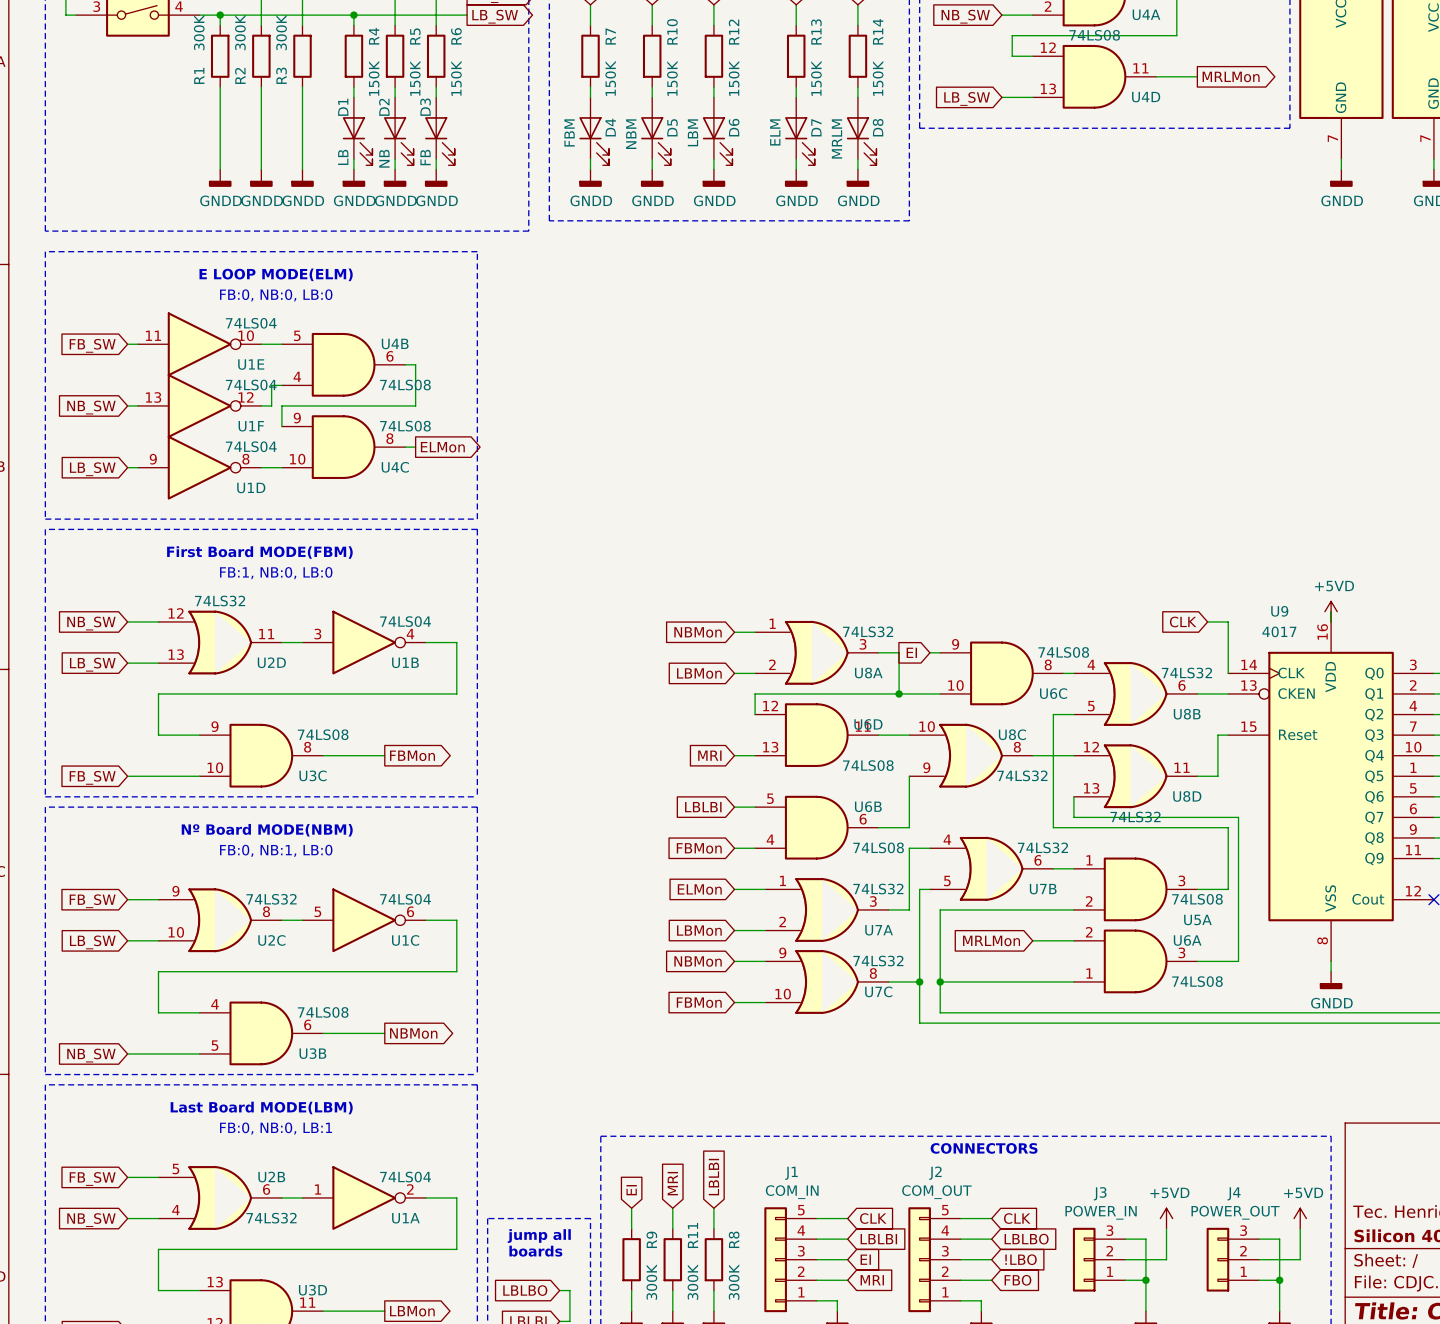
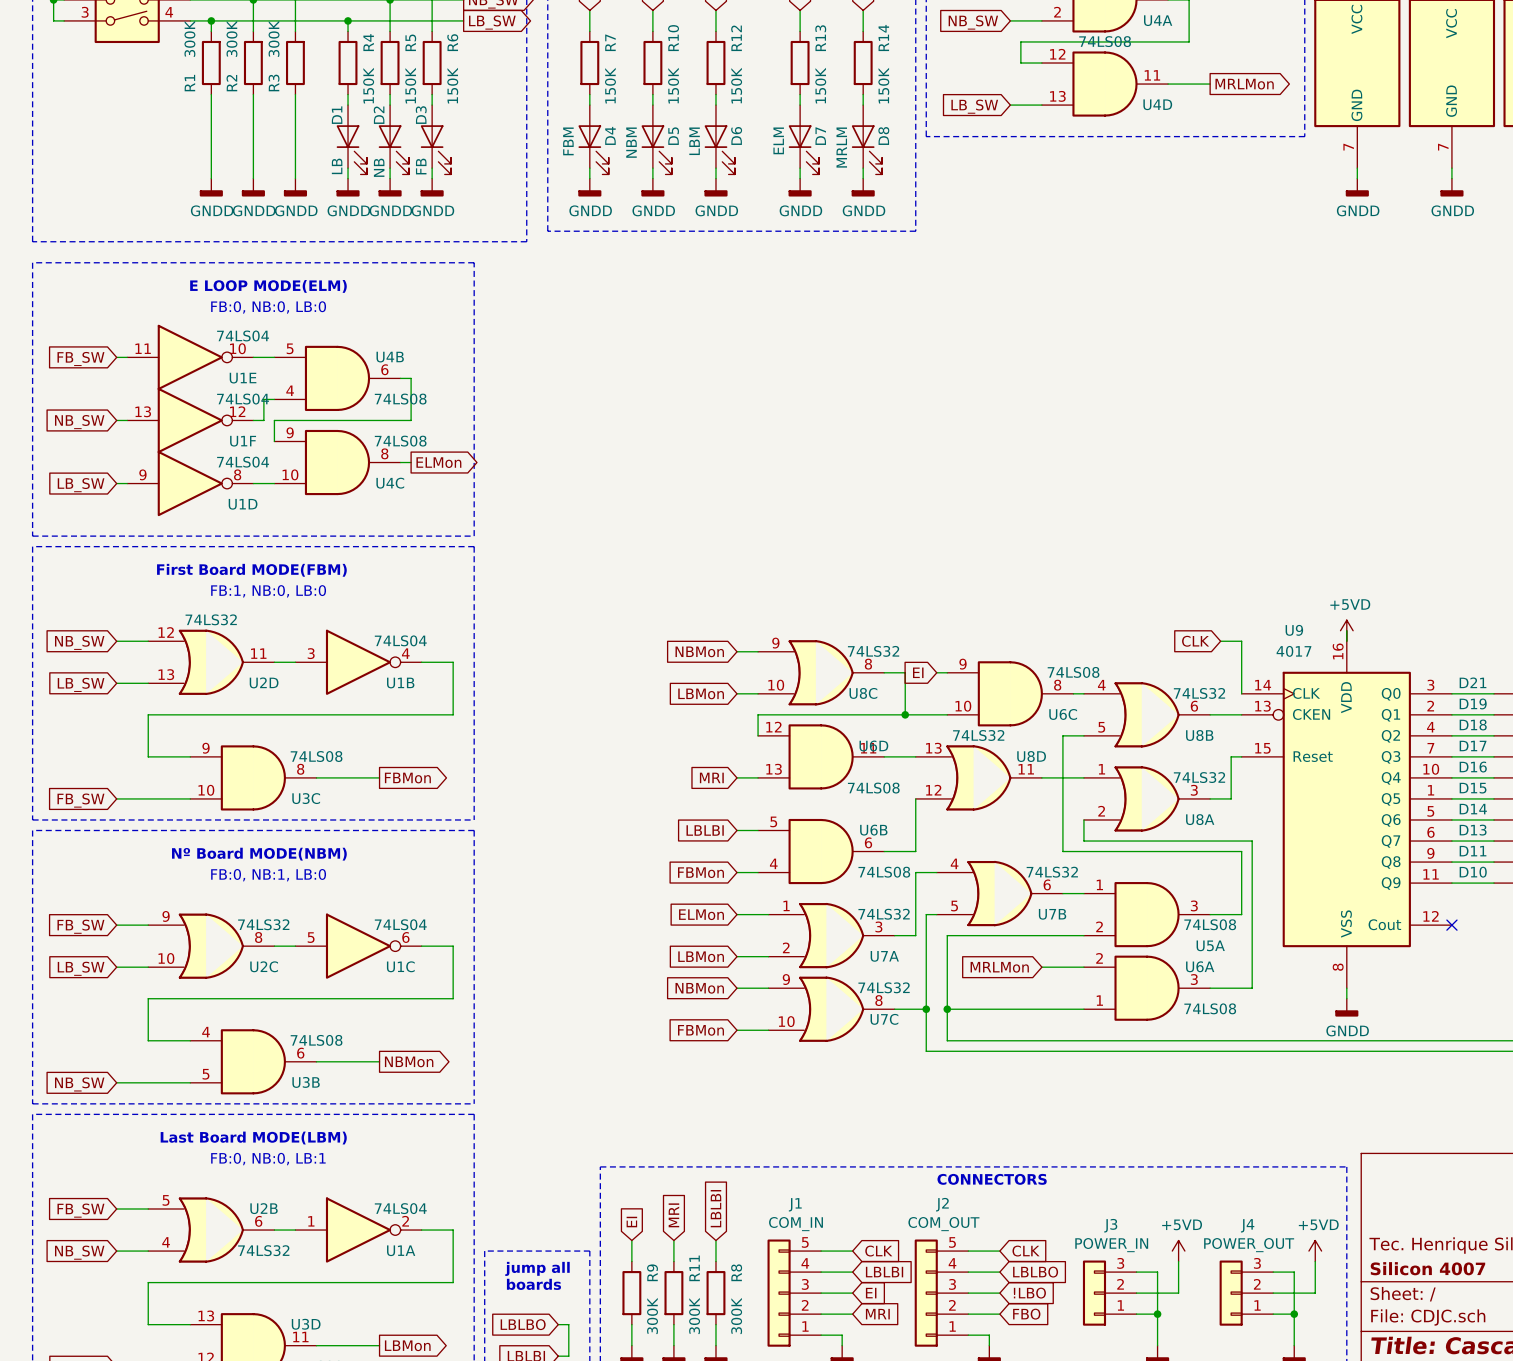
U8A position: (816, 652) -> (1147, 798)
U8C flip: as is (971, 755) -> up-down (821, 672)
U8C position: (971, 755) -> (821, 672)
U8D flip: as is (1135, 776) -> up-down (978, 777)
U8D position: (1135, 776) -> (978, 777)

